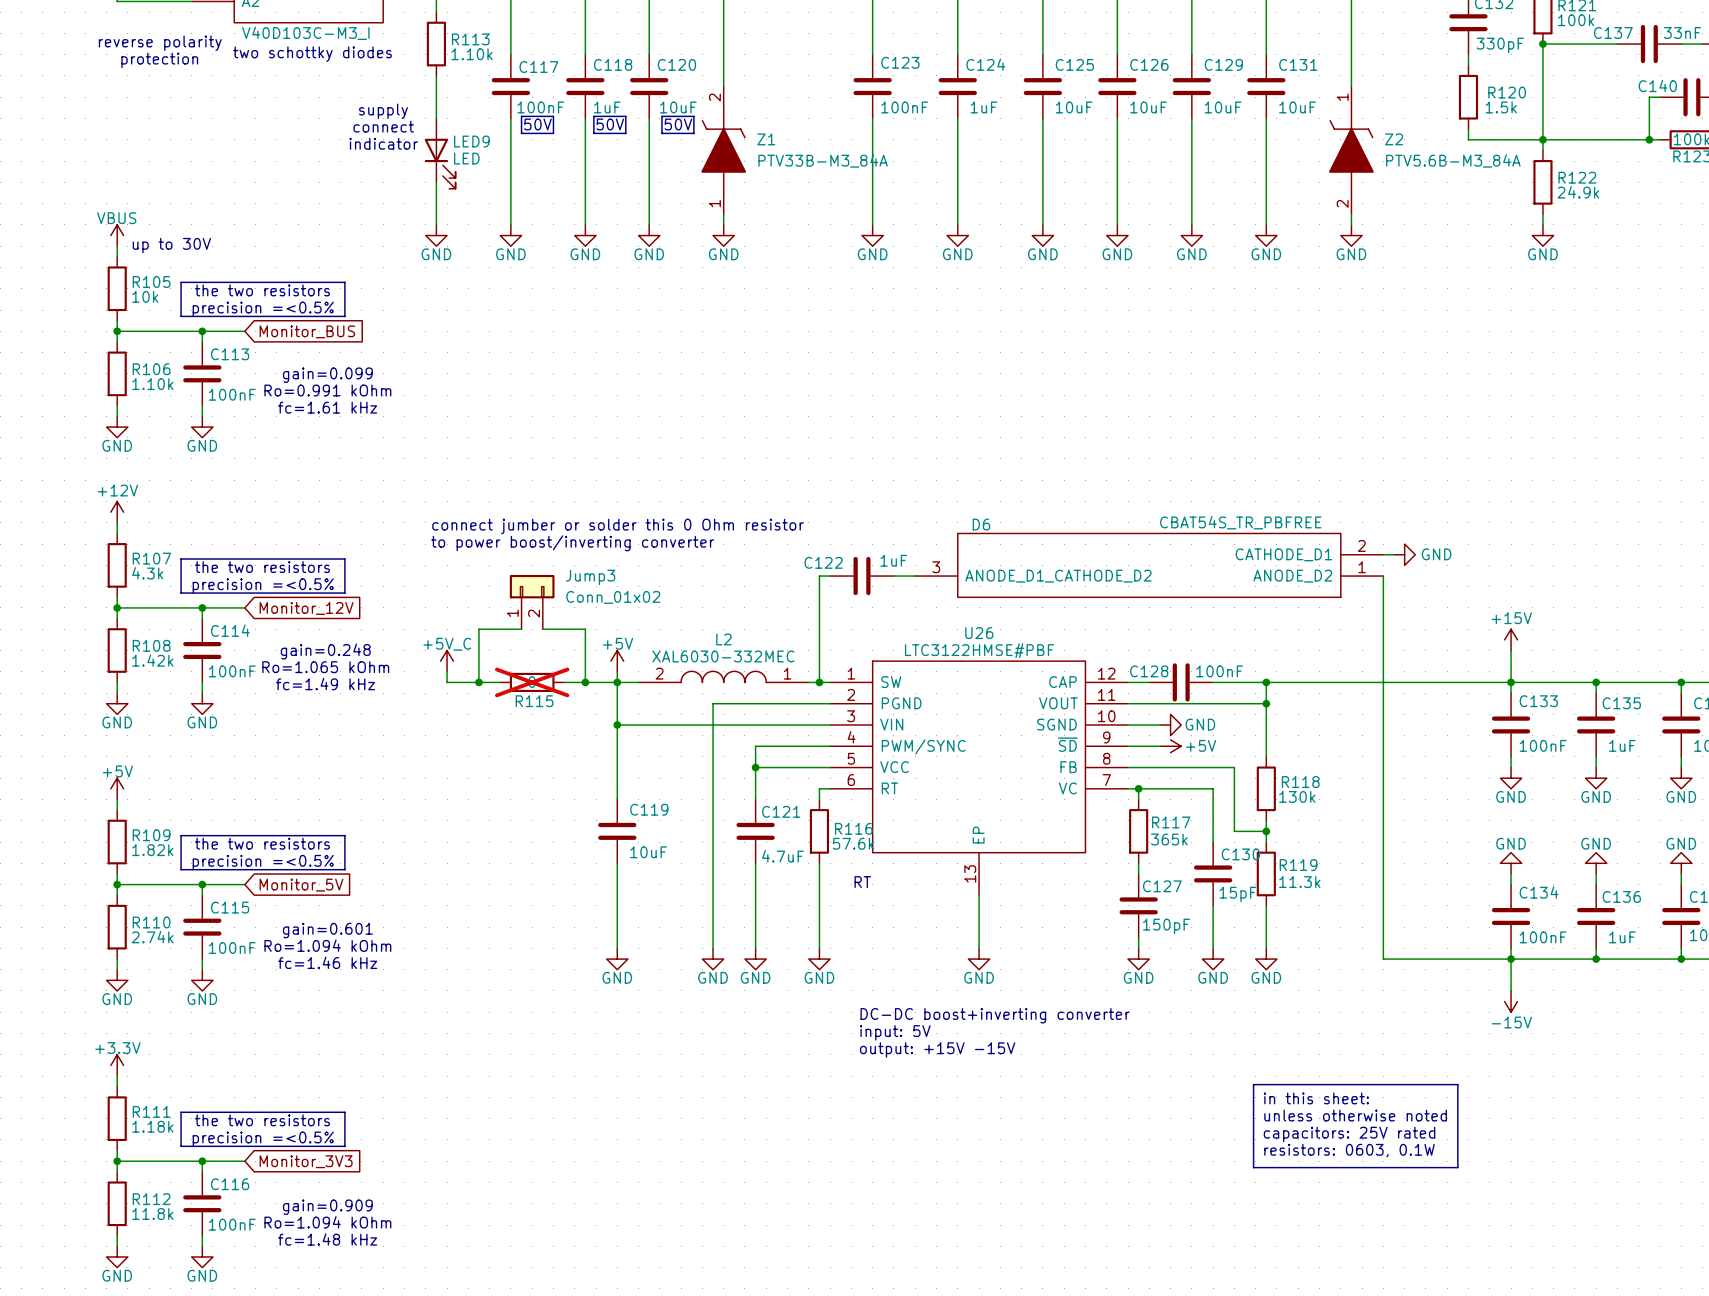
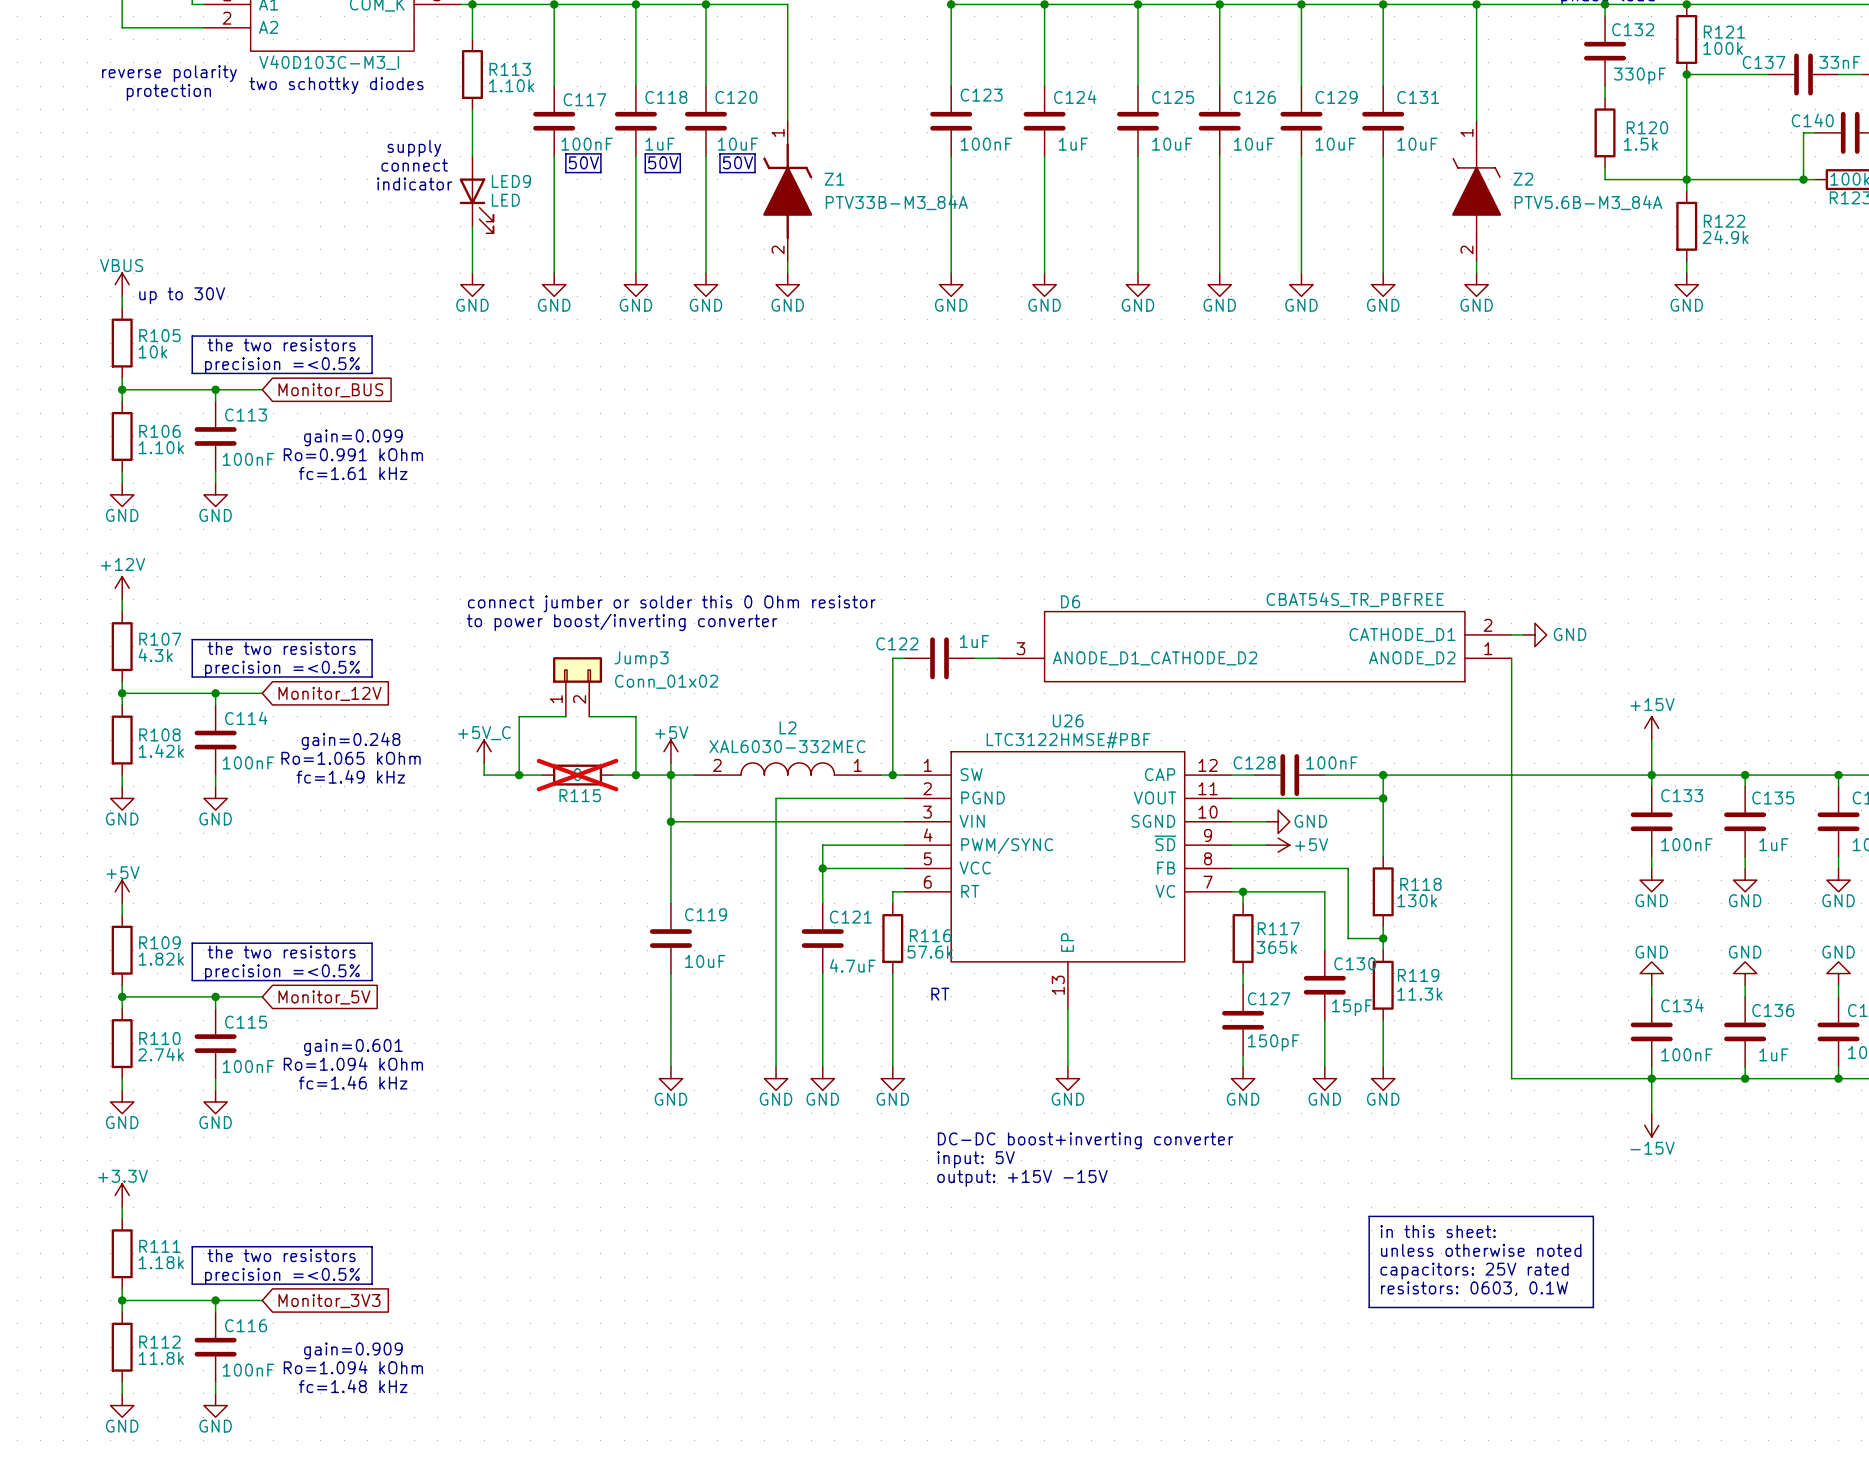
Z1 symbol: [701, 86, 747, 215] -> [763, 121, 813, 262]

